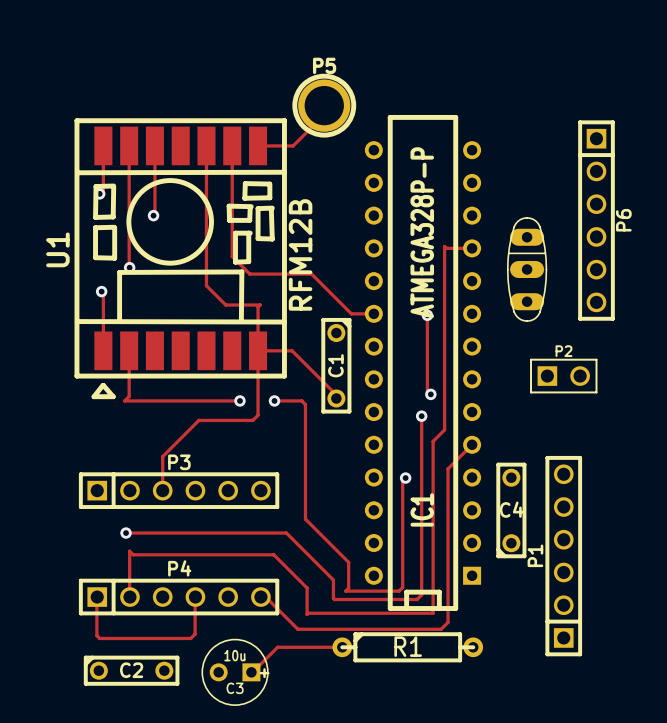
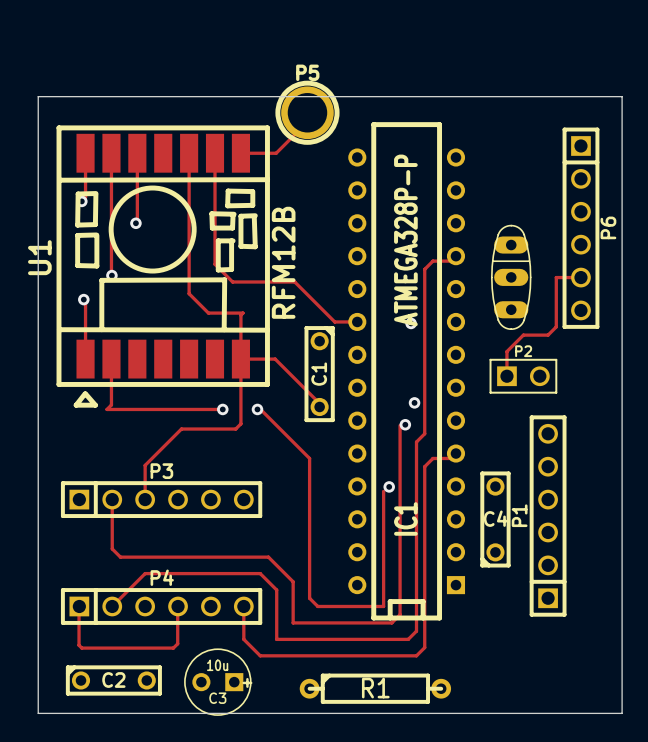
board edge: none -> (38, 96) (38, 713) (622, 713) (622, 96) (38, 96)
track: (472, 248) (446, 248) (444, 246) (444, 429) (433, 441) (433, 613) (307, 614) (307, 588) (273, 554) (133, 554) (129, 551) (129, 590) -> none
track: none -> (449, 261) (432, 261) (424, 269) (424, 433) (416, 442) (416, 631) (408, 639) (276, 639) (276, 590) (260, 573) (145, 573) (112, 606)
track: none -> (580, 277) (556, 277) (556, 326) (548, 335) (523, 335) (506, 351) (506, 376)
track: (427, 315) (427, 390) (430, 394) -> none
P2 position: (563, 376) -> (523, 376)
track: (274, 400) (301, 400) (305, 404) (305, 519) (348, 562) (348, 588) (345, 591) (399, 591) (402, 587) (402, 480) (405, 478) -> none
track: none -> (260, 409) (309, 458) (309, 598) (317, 606) (383, 606) (383, 491)
track: none -> (400, 425) (400, 614) (391, 622) (293, 622) (293, 581) (268, 557) (120, 557) (112, 548) (112, 499)
track: (421, 416) (421, 594) (417, 599) (334, 599) (333, 580) (286, 533) (126, 533) -> none
track: (472, 444) (448, 468) (448, 622) (441, 629) (297, 629) (260, 590) -> none
track: none -> (449, 458) (432, 458) (424, 466) (424, 647) (416, 655) (260, 655) (243, 639) (243, 606)
via: (126, 533) -> none
P1 position: (563, 556) -> (548, 516)
track: (342, 647) (277, 647) (251, 672) -> none
R1 position: (407, 647) -> (375, 688)

